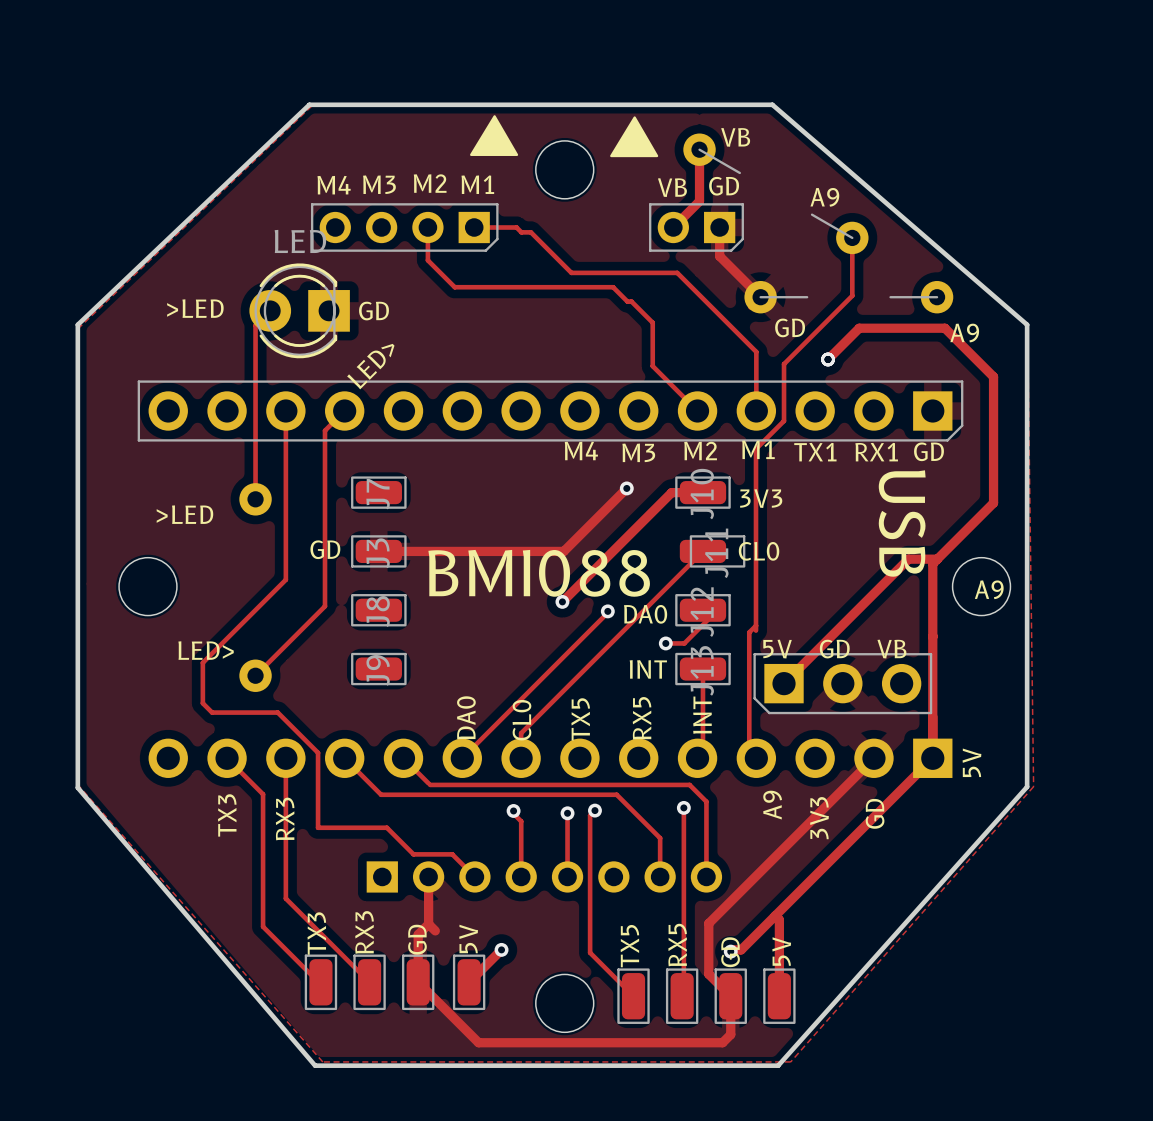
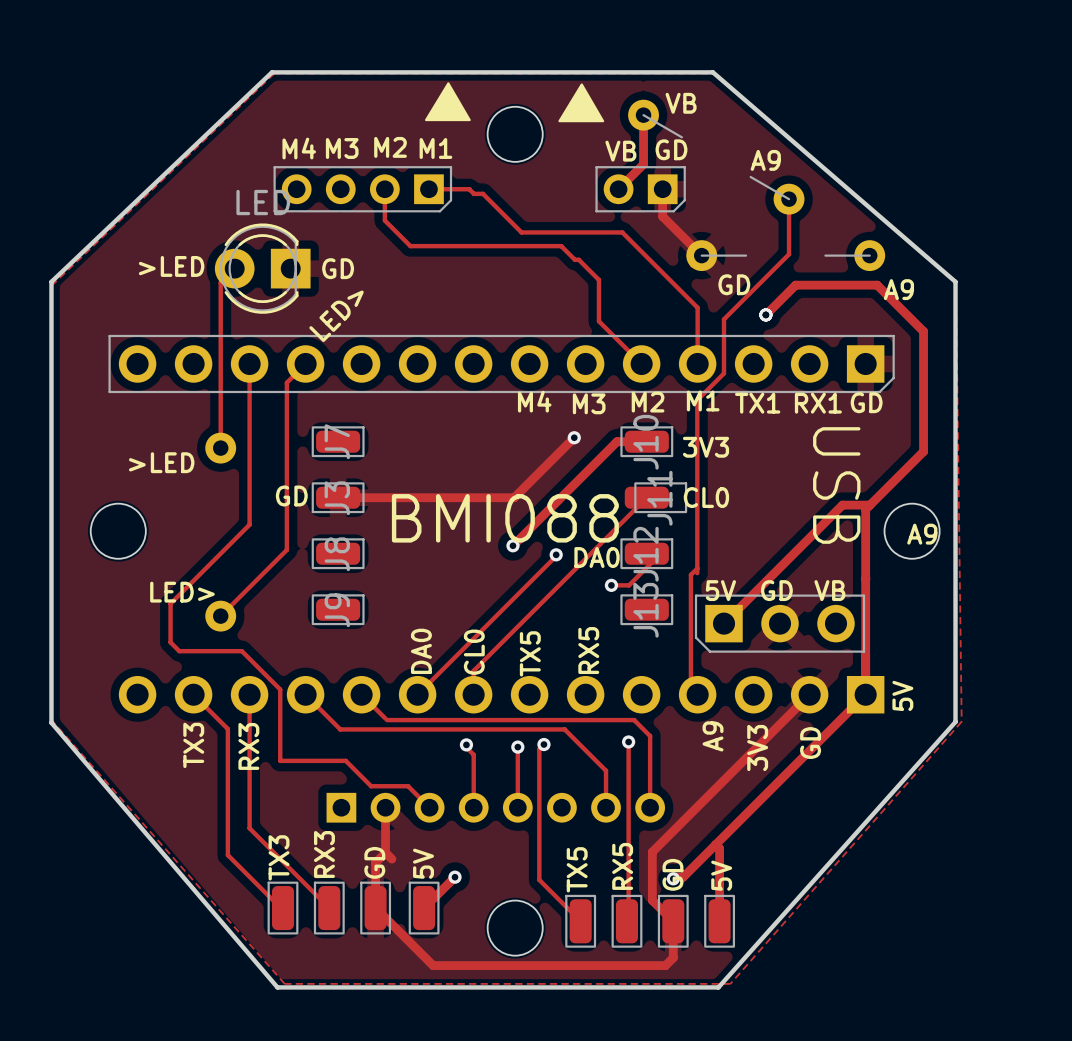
text: INT (648, 669) -> none
track: (702, 669) (702, 752) -> none
text: INT (702, 715) -> none

